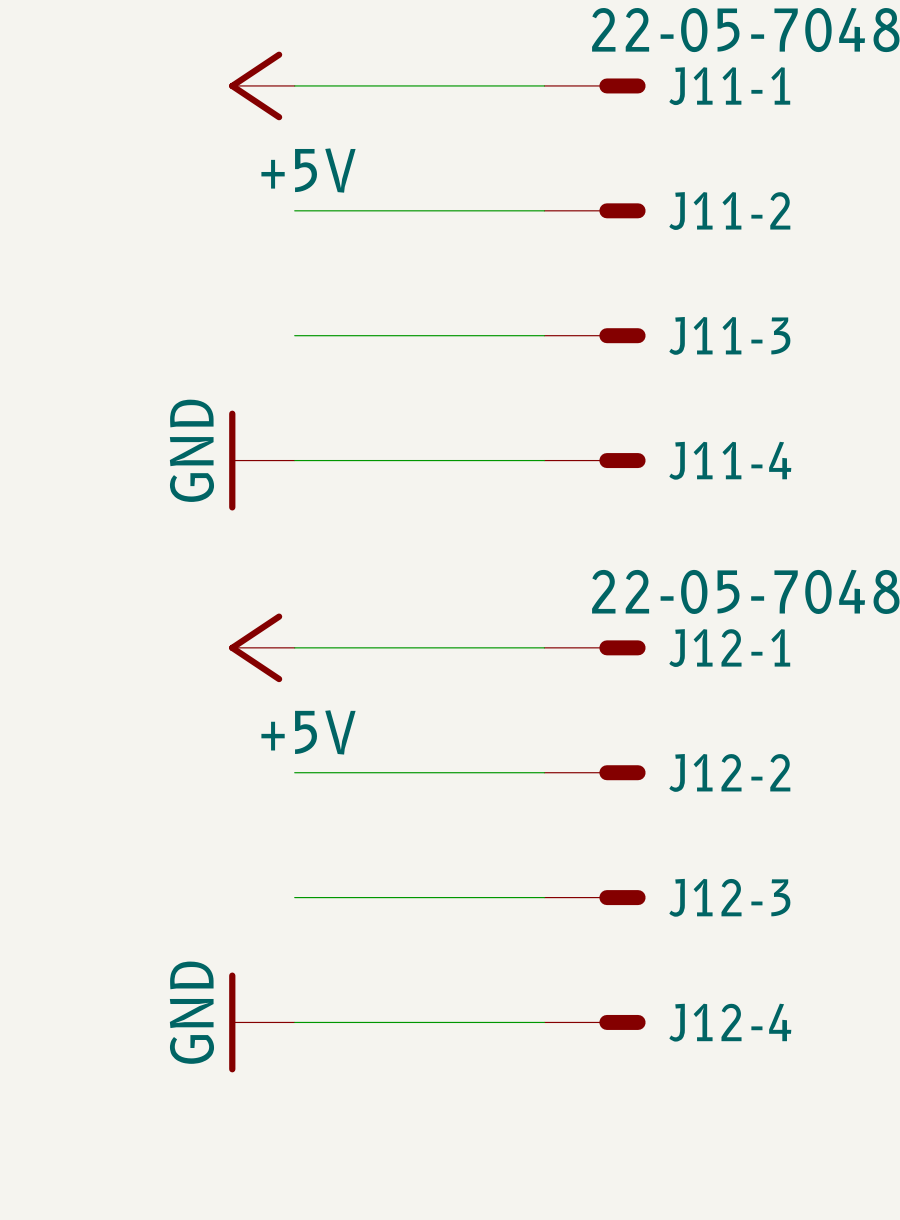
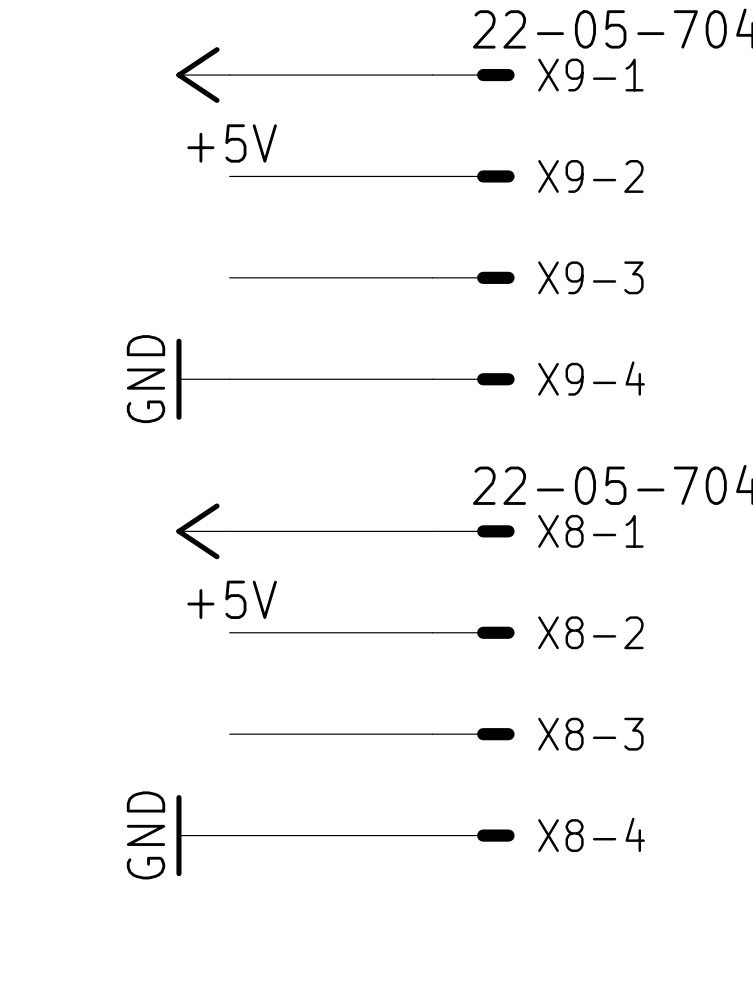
J11-1 name: J11-1 (729, 86) -> X9-1 (590, 75)
J11-2 name: J11-2 (729, 211) -> X9-2 (590, 176)
J11-3 name: J11-3 (729, 335) -> X9-3 (590, 277)
J11-4 name: J11-4 (730, 460) -> X9-4 (591, 378)
J12-1 name: J12-1 (729, 648) -> X8-1 (590, 531)
J12-2 name: J12-2 (729, 772) -> X8-2 (590, 632)
J12-3 name: J12-3 (729, 897) -> X8-3 (590, 734)
J12-4 name: J12-4 (730, 1022) -> X8-4 (591, 834)

